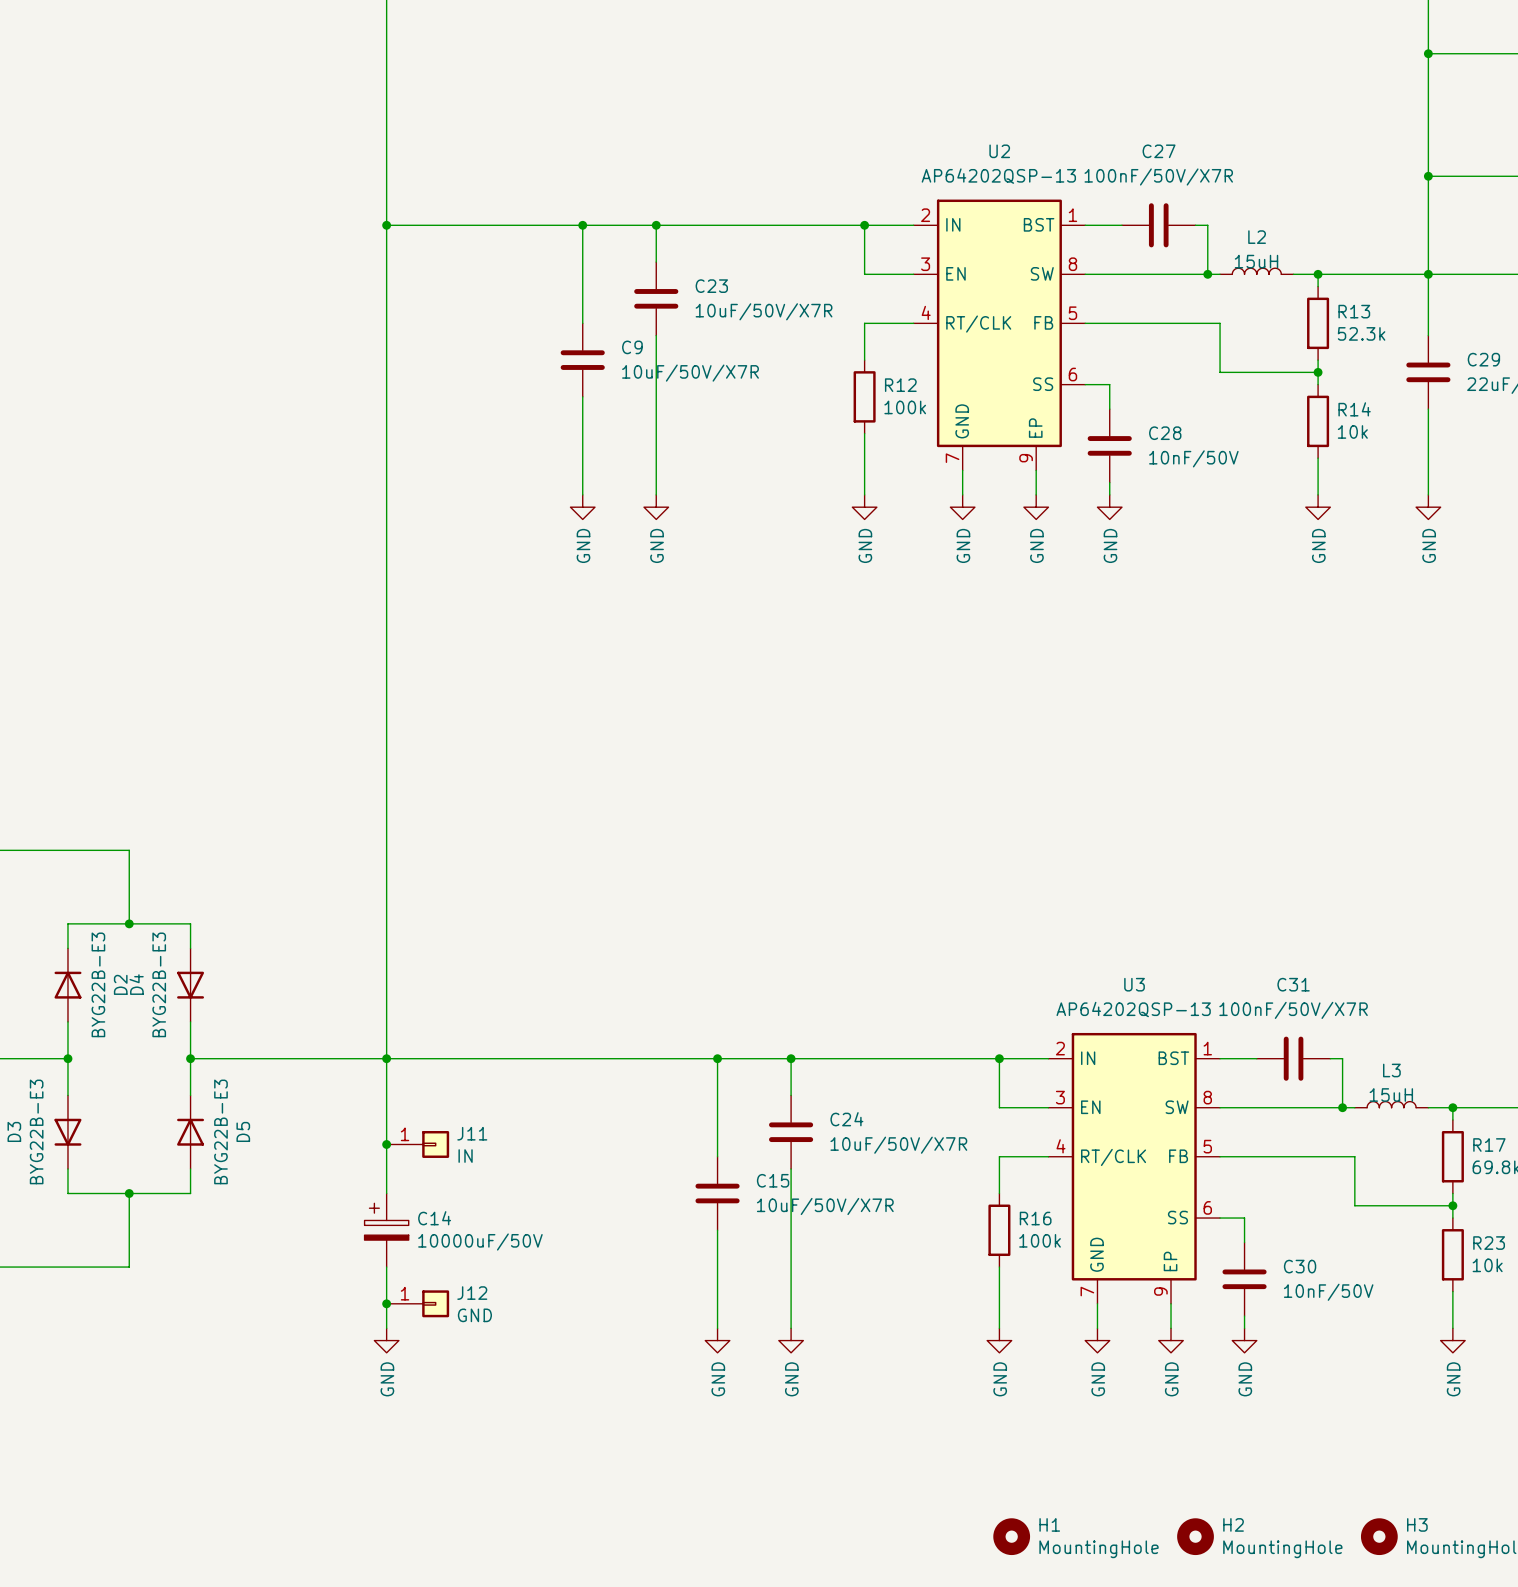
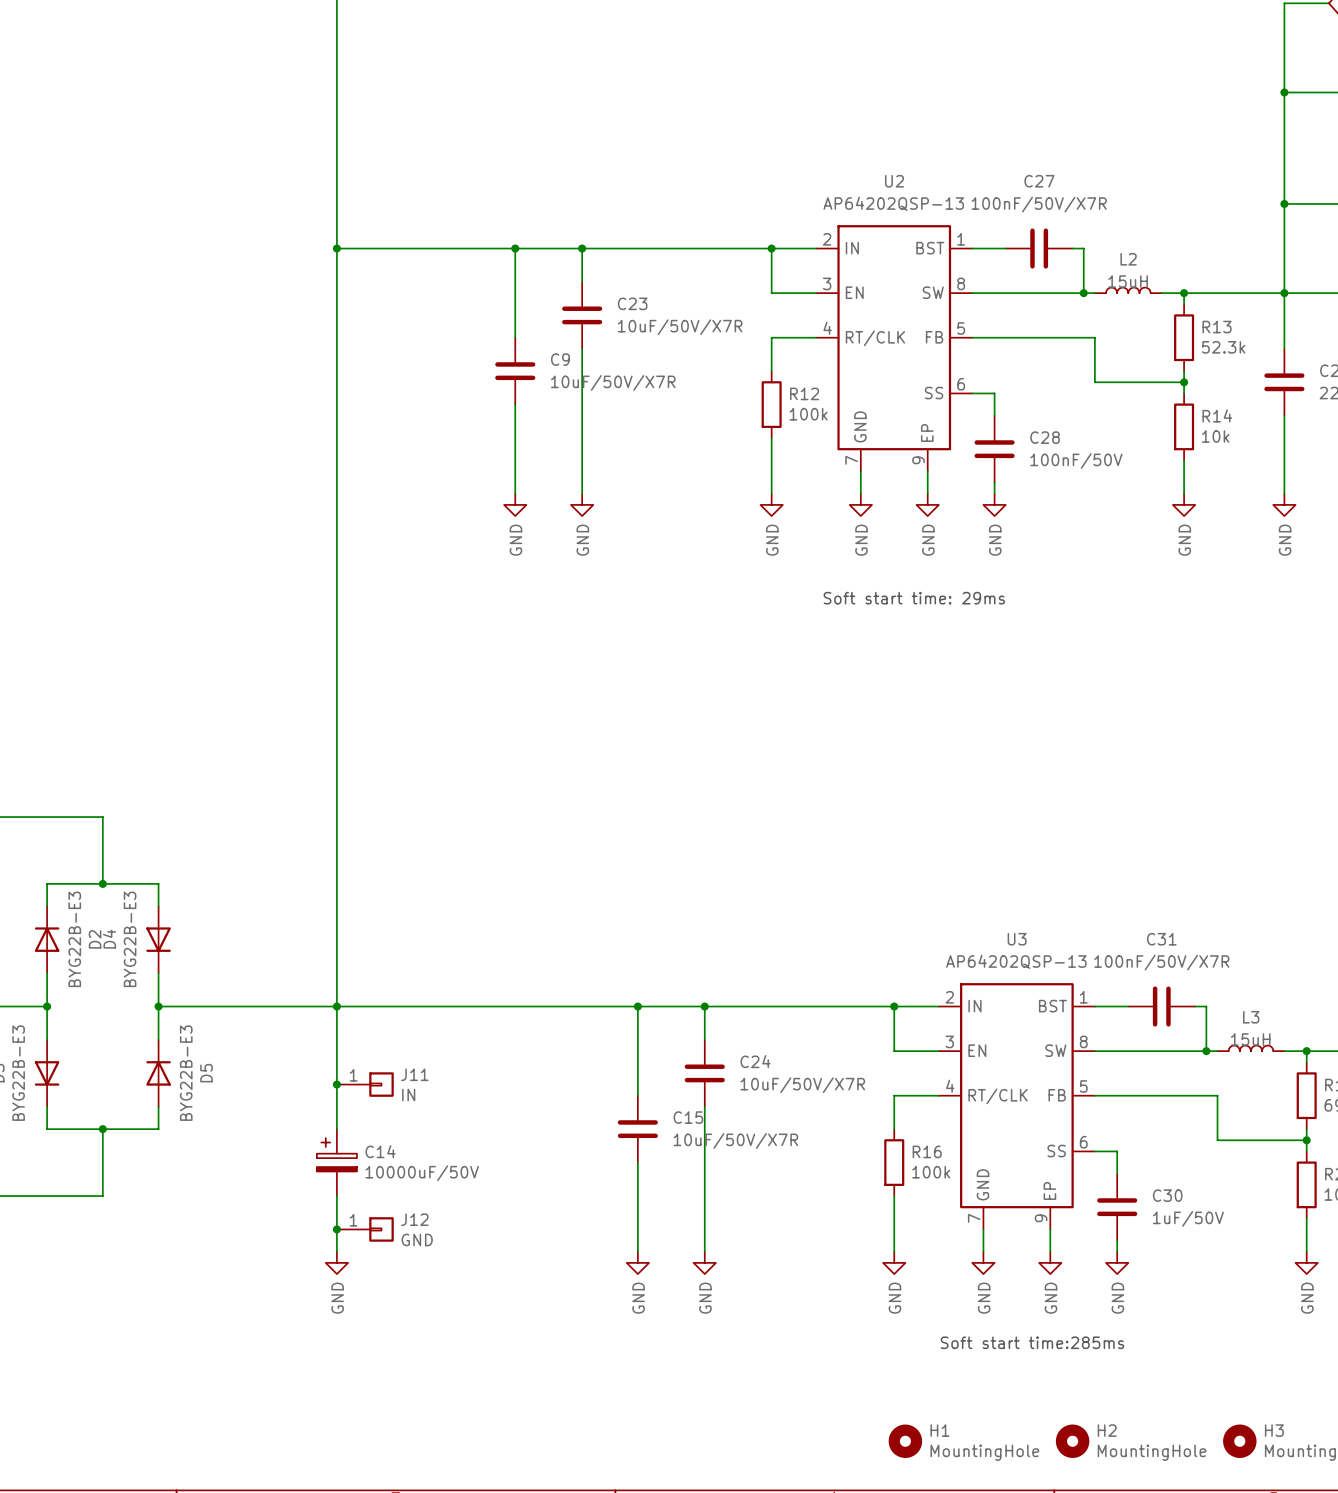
C28 value: 10nF/50V (1193, 458) -> 100nF/50V (1076, 460)
text: none -> Soft start time: 29ms (914, 598)
C30 value: 10nF/50V (1328, 1292) -> 1uF/50V (1188, 1218)
text: none -> Soft start time:285ms (1032, 1342)

